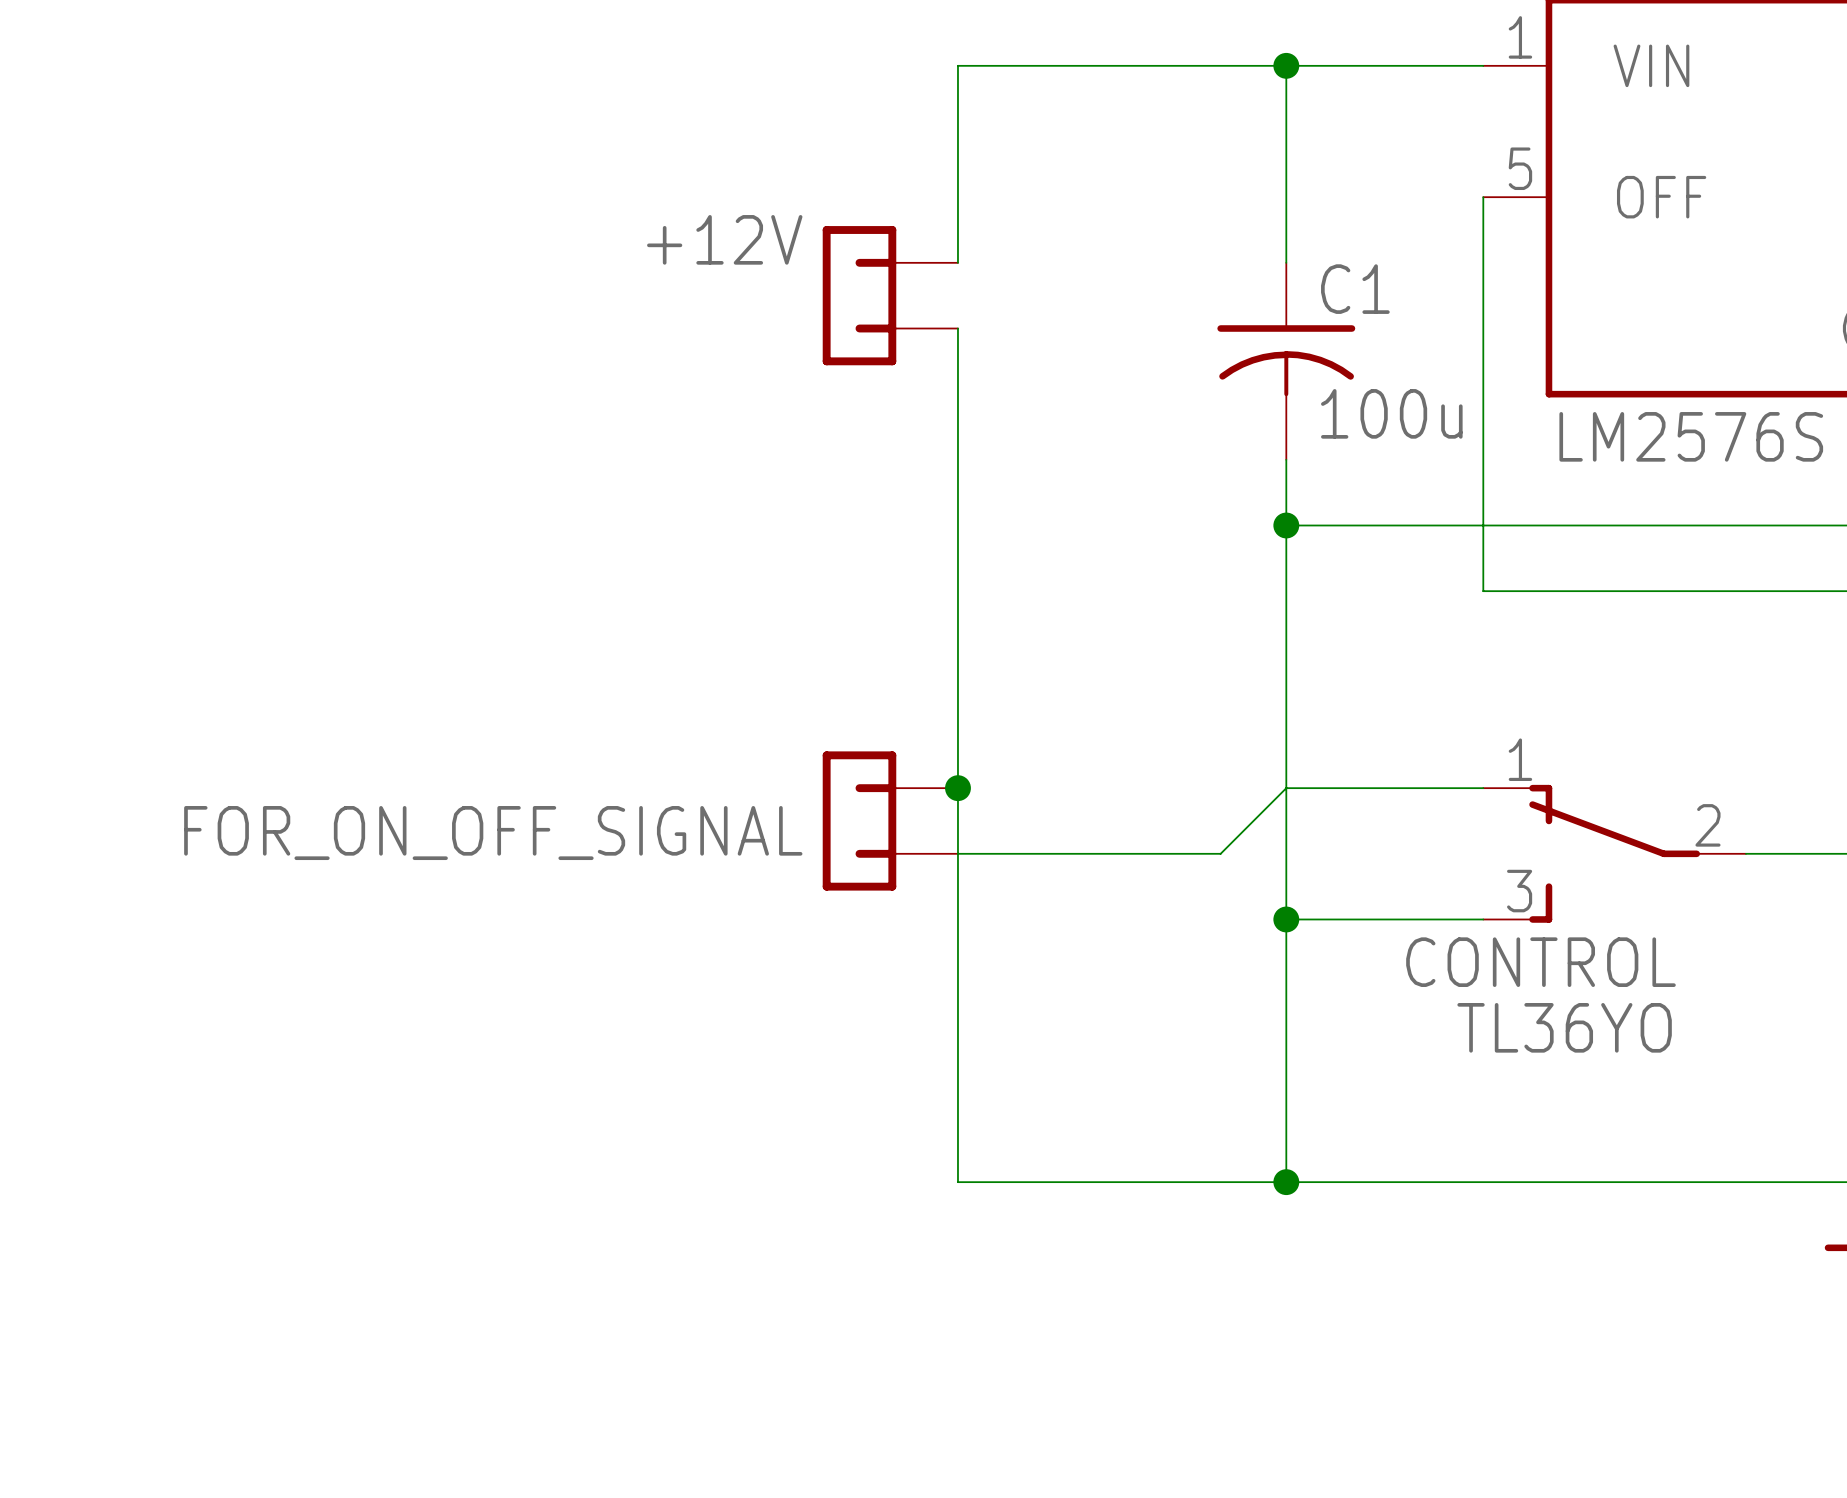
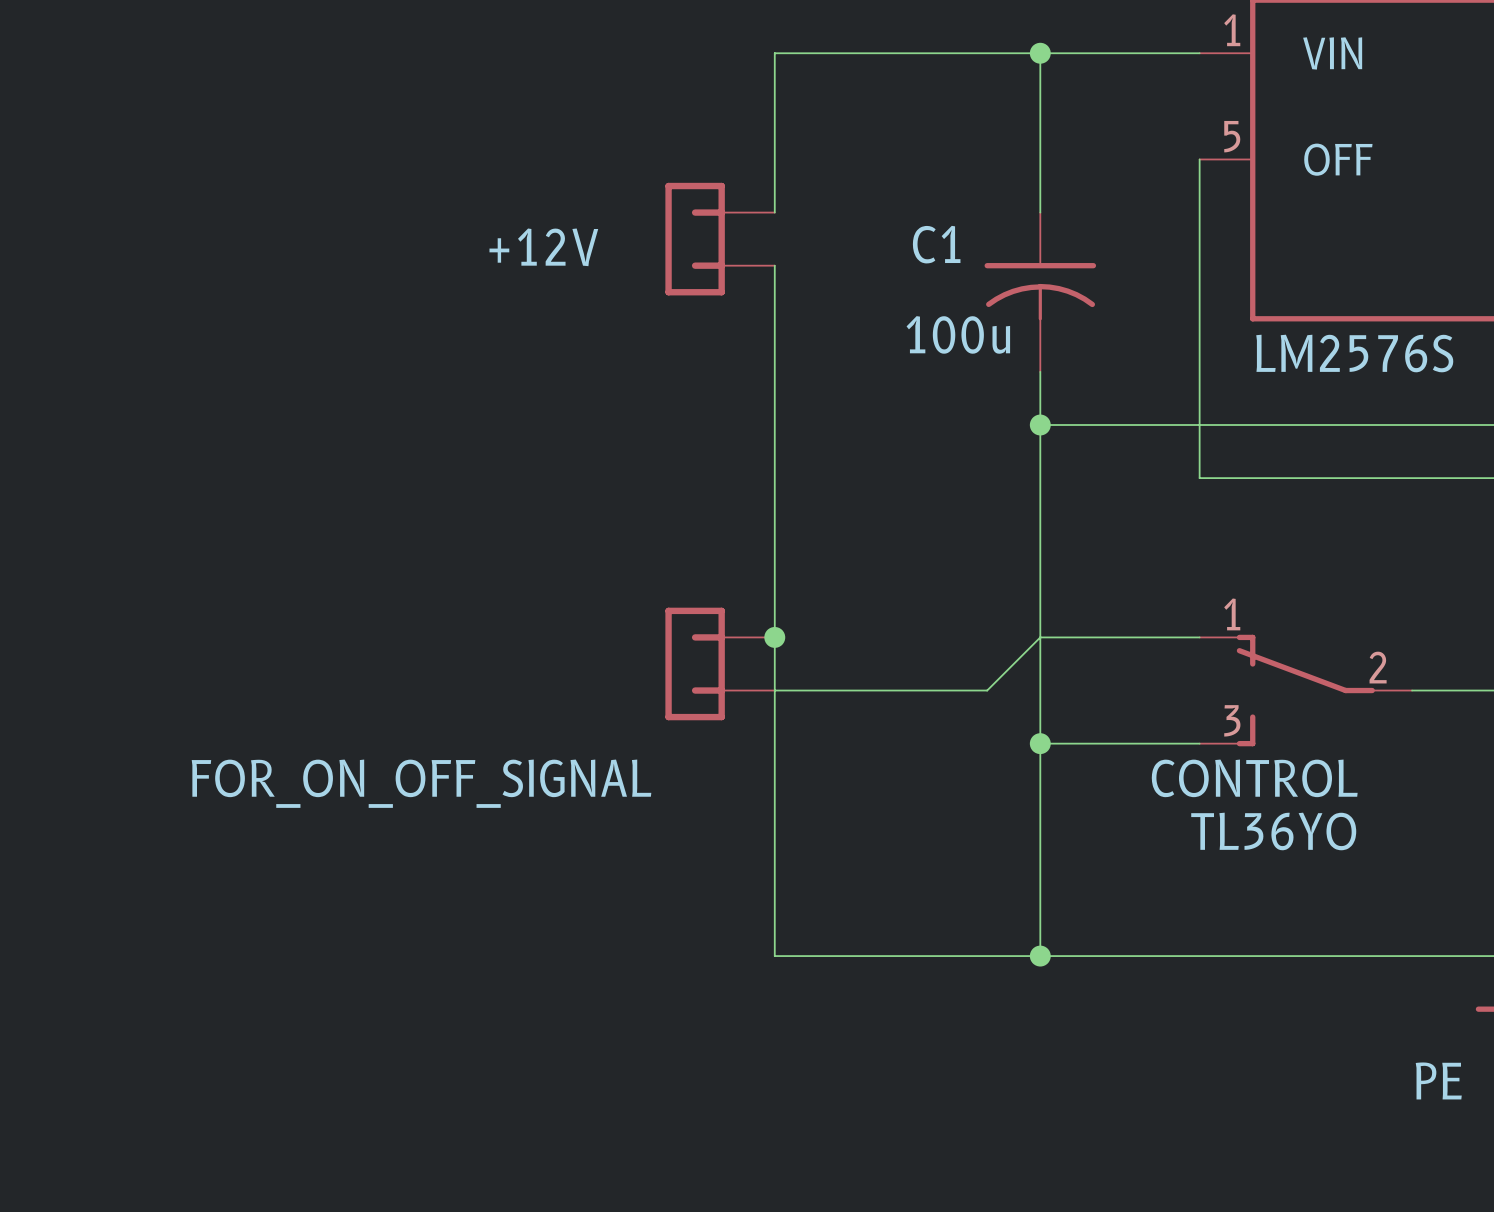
+12V name position: +12V (724, 239) -> +12V (543, 247)
C1 name position: C1 (1355, 289) -> C1 (936, 244)
C1 value position: 100u (1391, 413) -> 100u (958, 334)
FOR_ON_OFF_SIGNAL name position: FOR_ON_OFF_SIGNAL (493, 833) -> FOR_ON_OFF_SIGNAL (421, 783)
power symbol text: none -> PE (1438, 1080)

